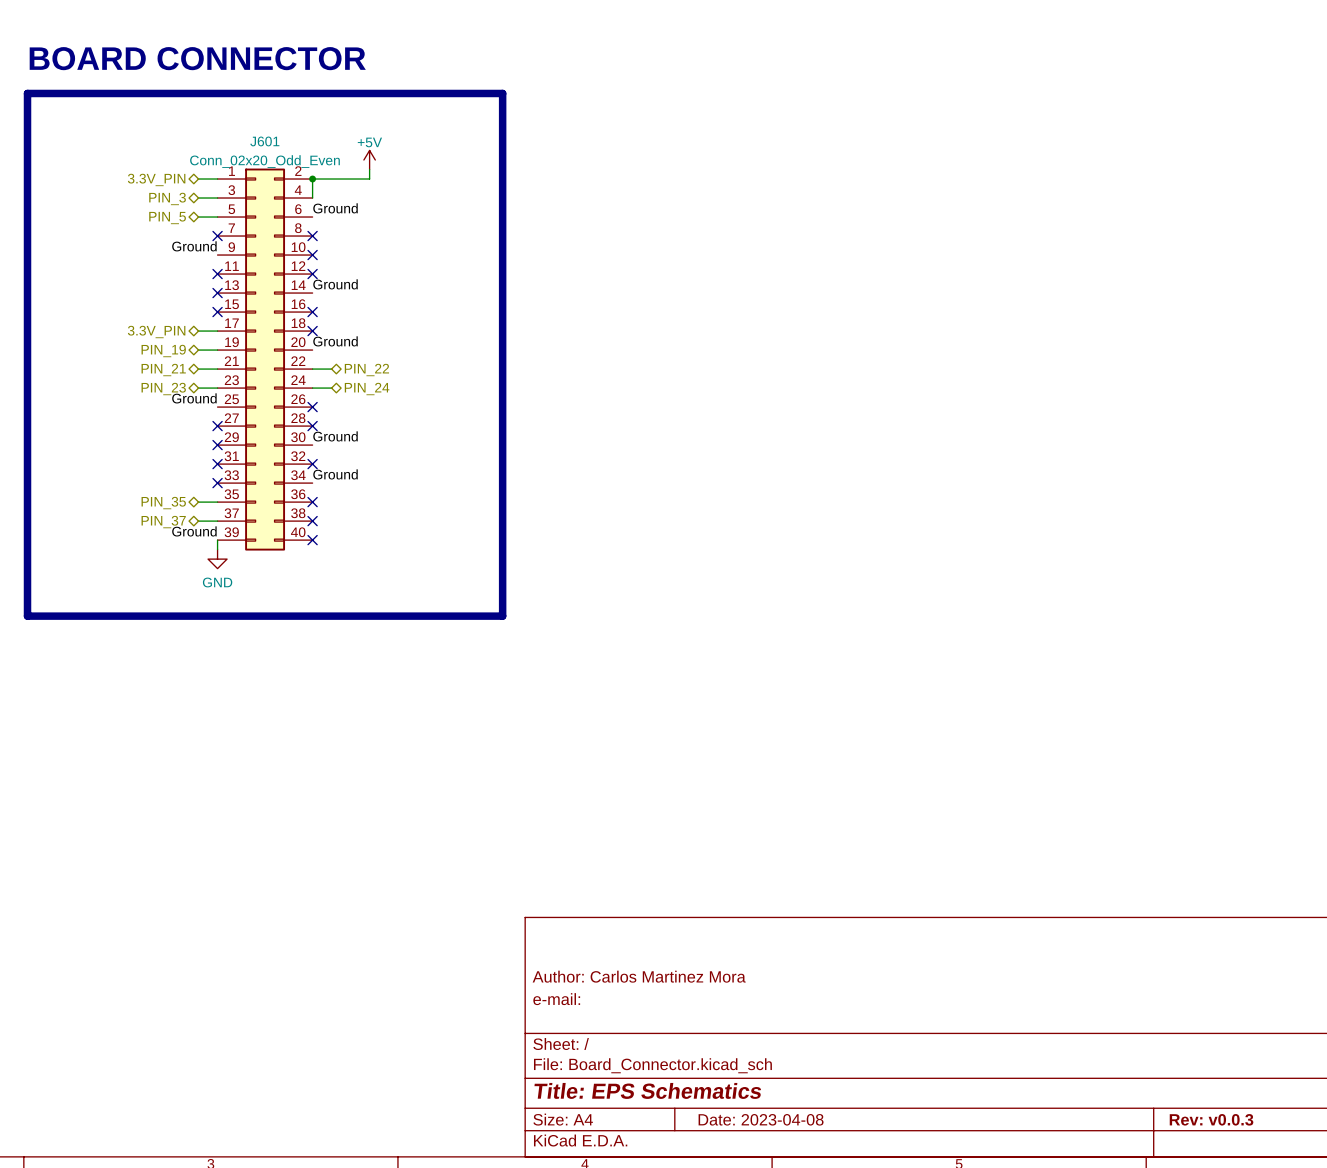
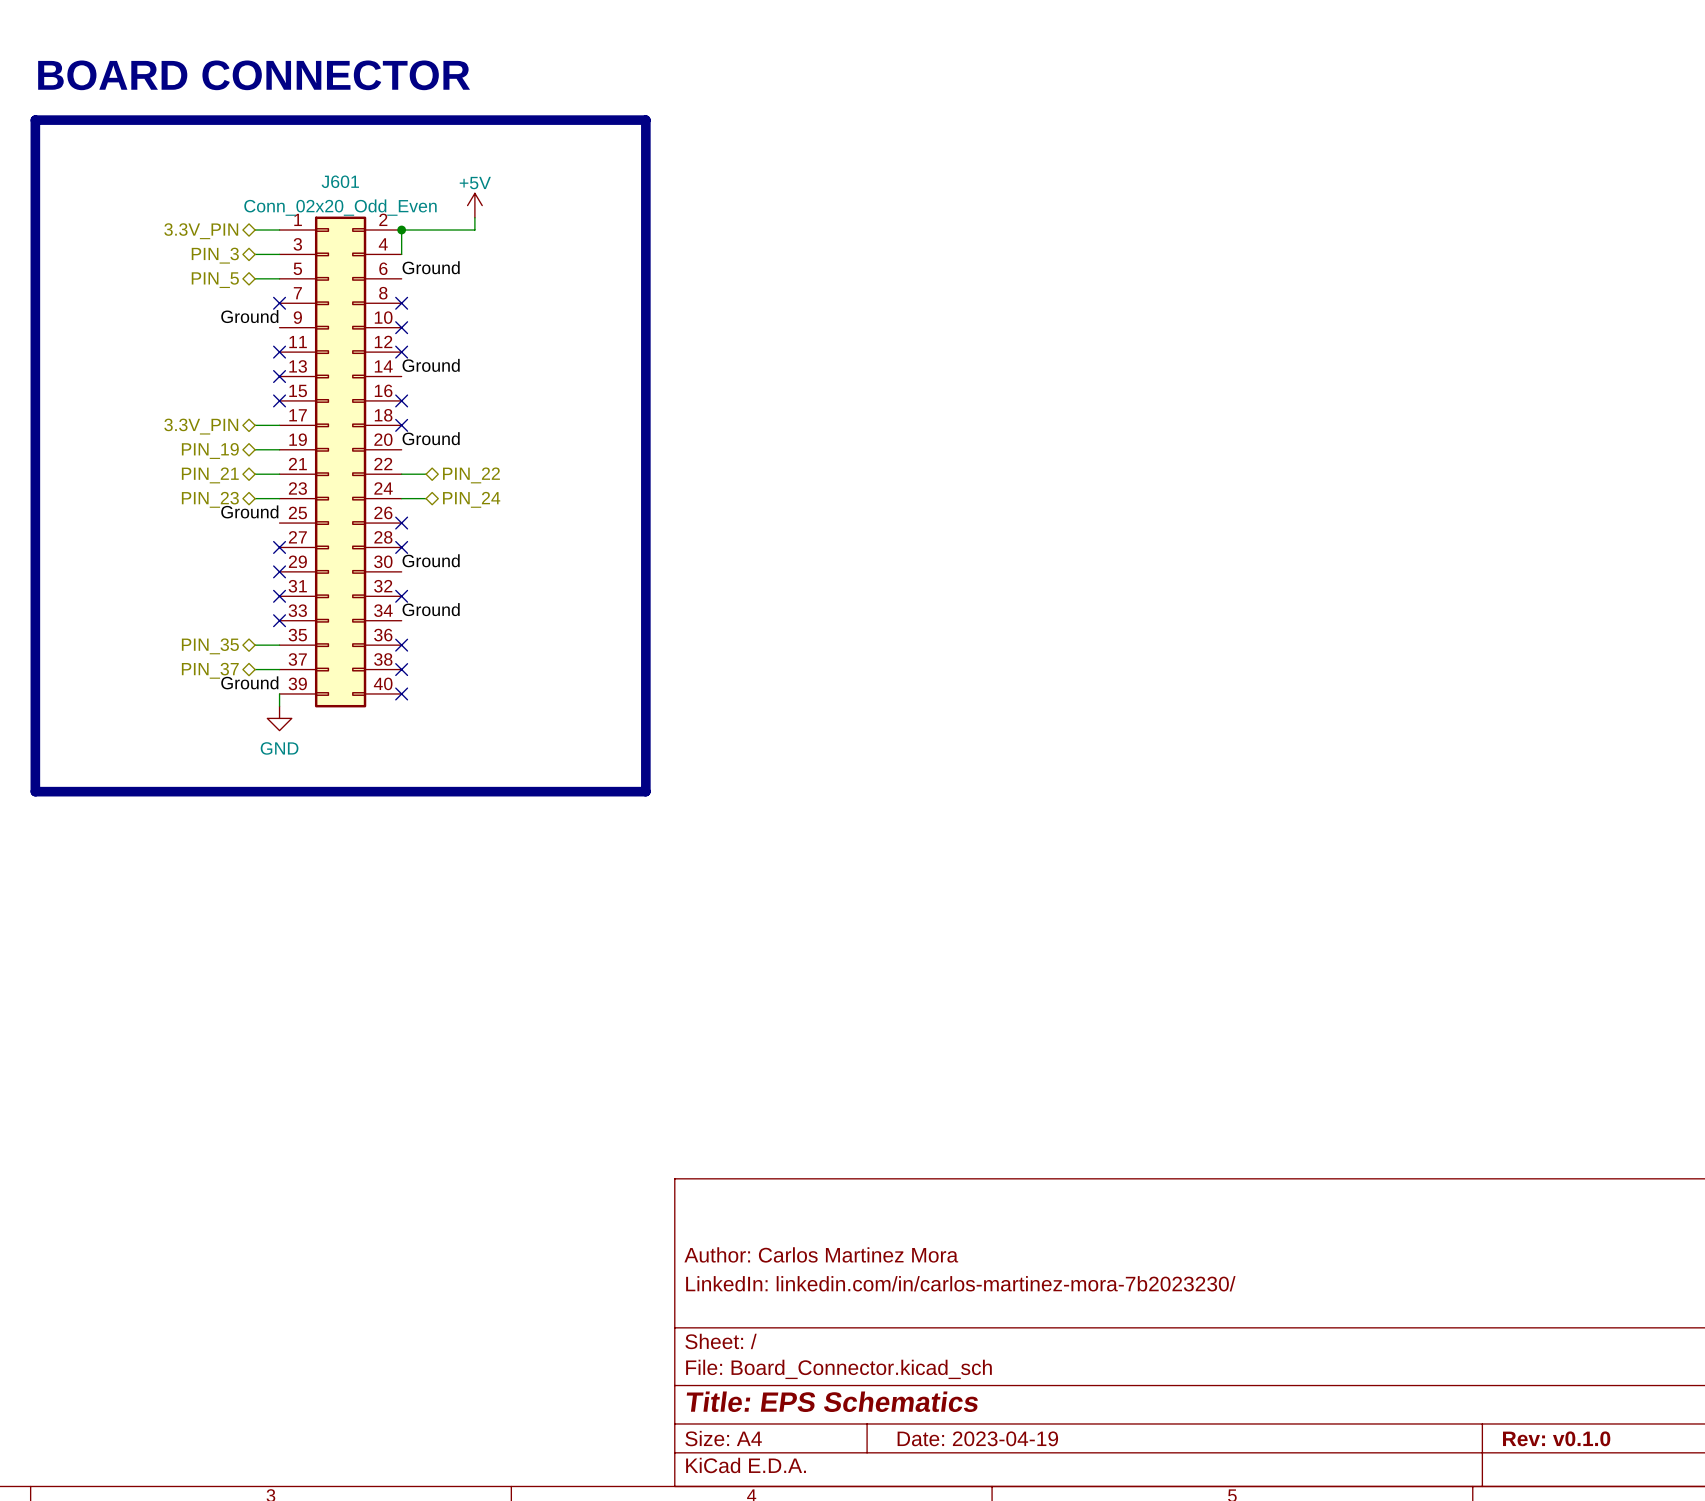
title block: e-mail: (556, 999) -> LinkedIn: linkedin.com/in/carlos-martinez-mora-7b2023230/ (960, 1283)
title block: Date: 2023-04-08 (761, 1119) -> Date: 2023-04-19 (977, 1438)
title block: Rev: v0.0.3 (1211, 1119) -> Rev: v0.1.0 (1556, 1438)

